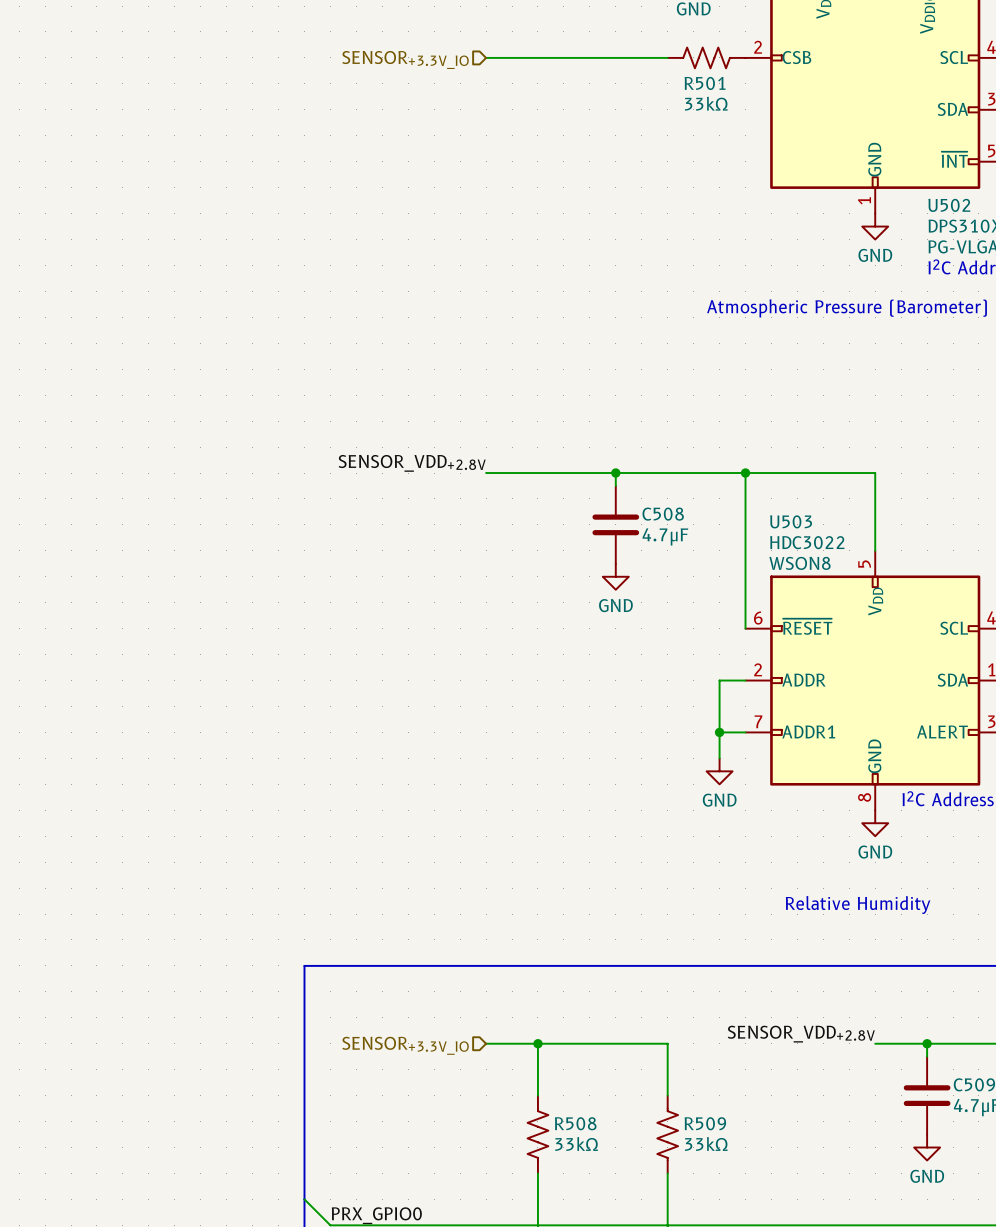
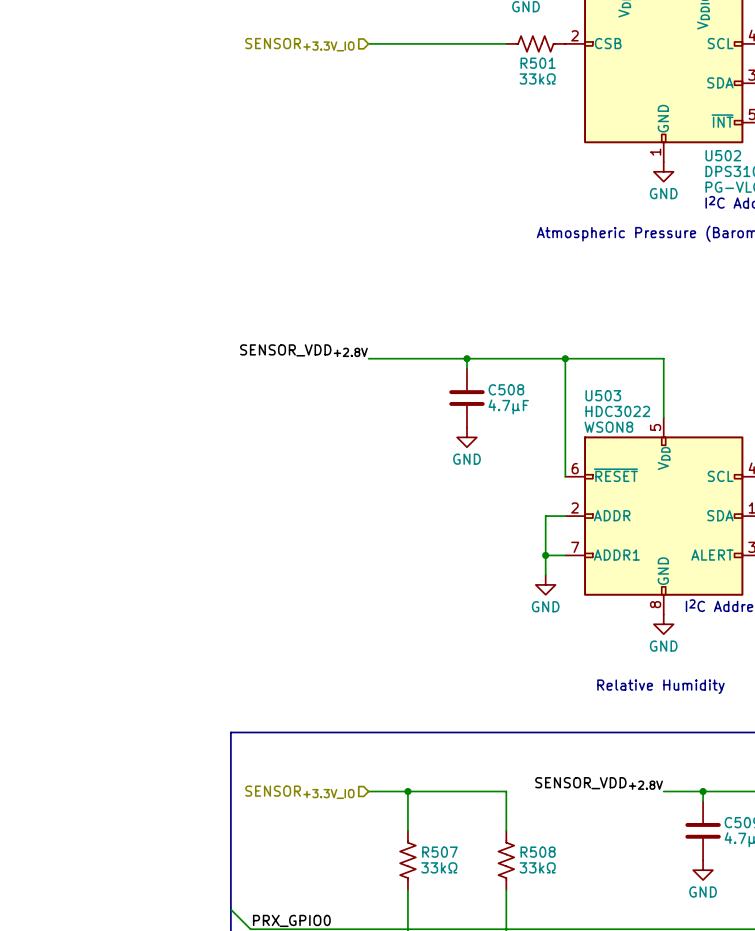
R508 name: R508 (575, 1123) -> R507 (439, 852)
R509 name: R509 (705, 1123) -> R508 (538, 852)

